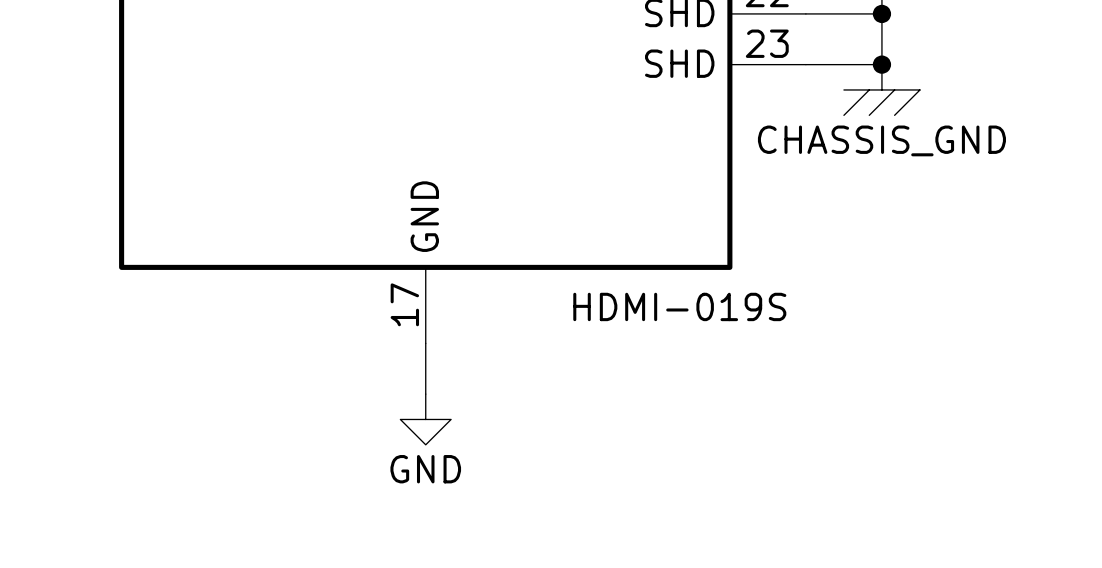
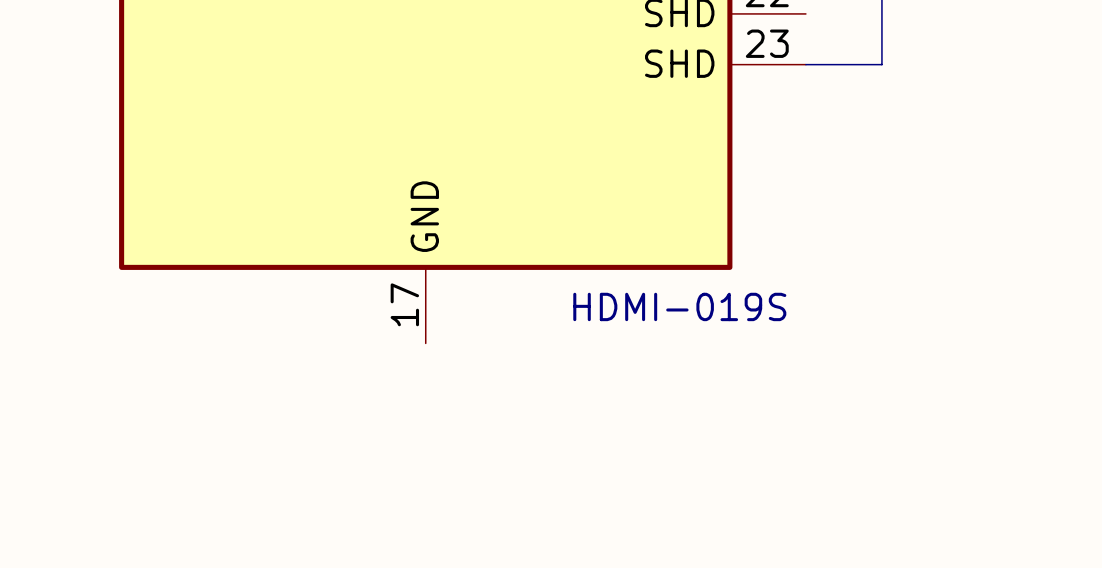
wire: (805, 13) (881, 13) -> none
junction: (881, 13) -> none
junction: (881, 64) -> none
power symbol: CHASSIS_GND (881, 89) -> none
wire: (425, 343) (425, 394) -> none
power symbol: GND (425, 419) -> none

